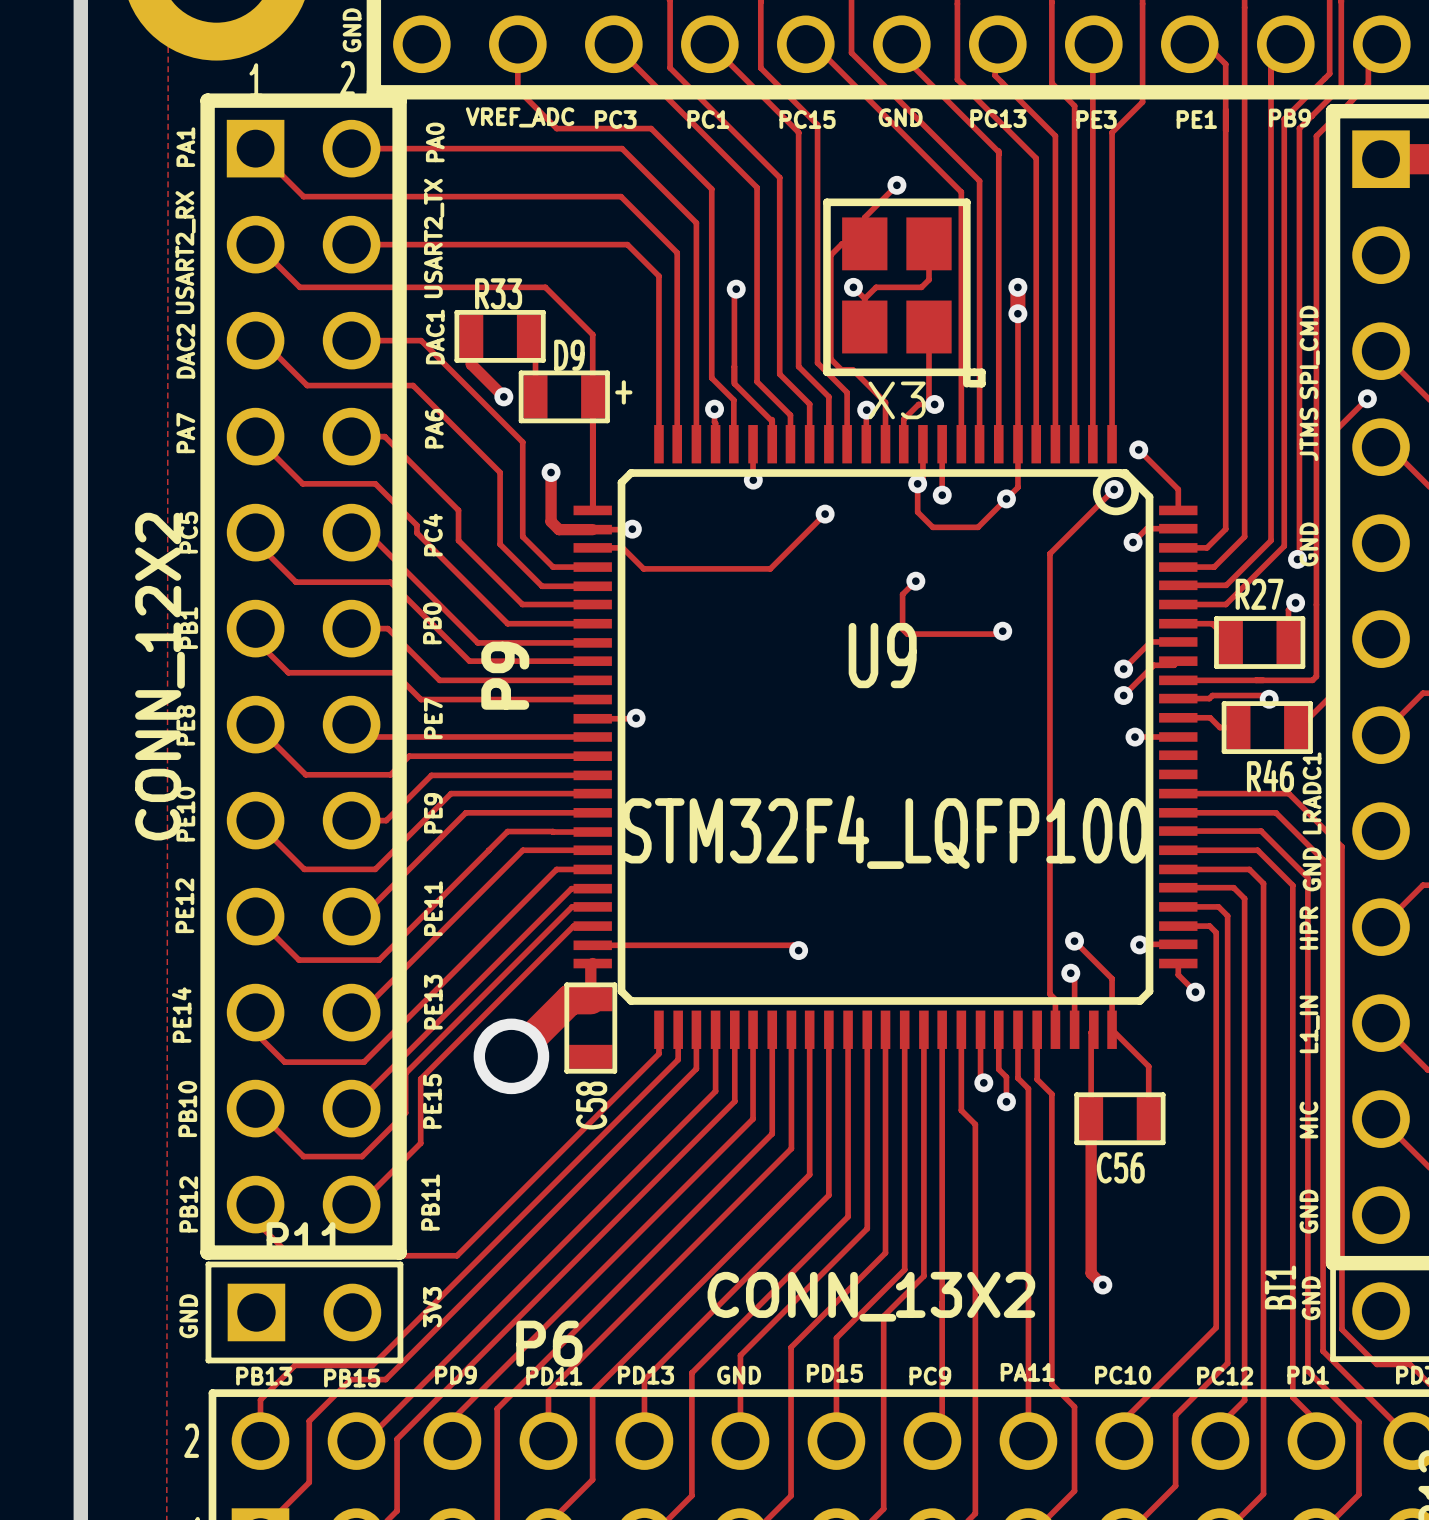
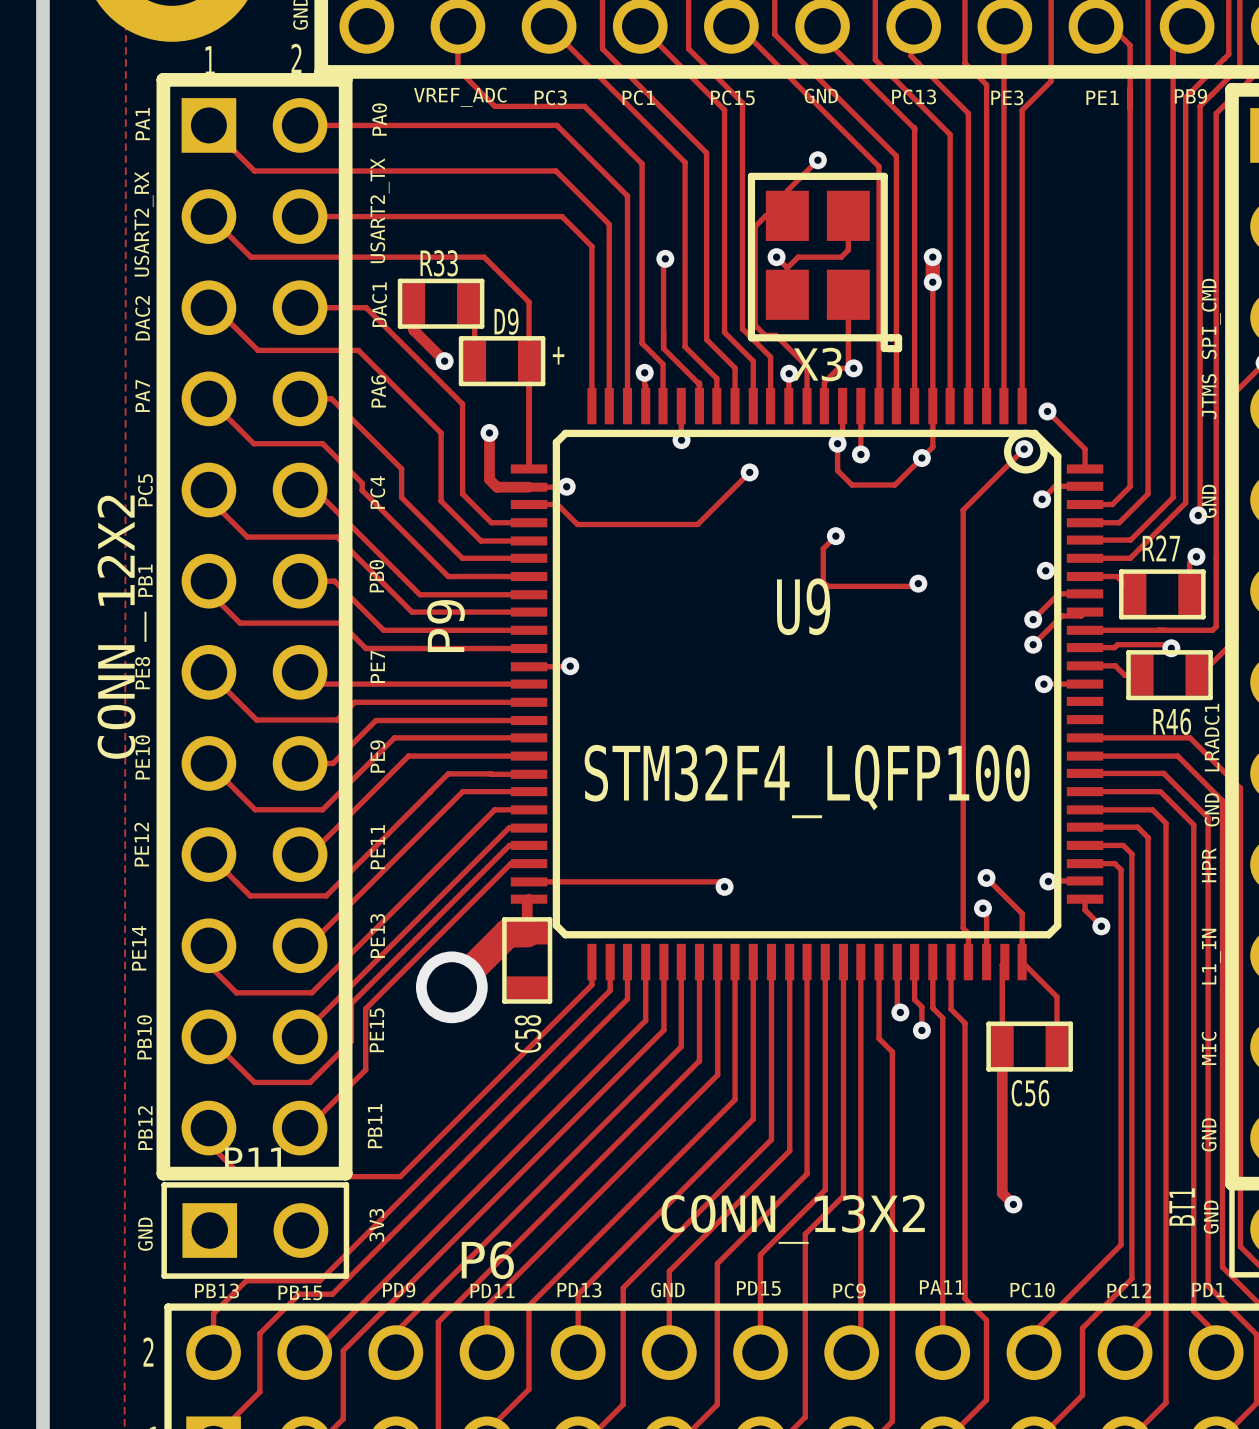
via: none -> (1045, 570)

